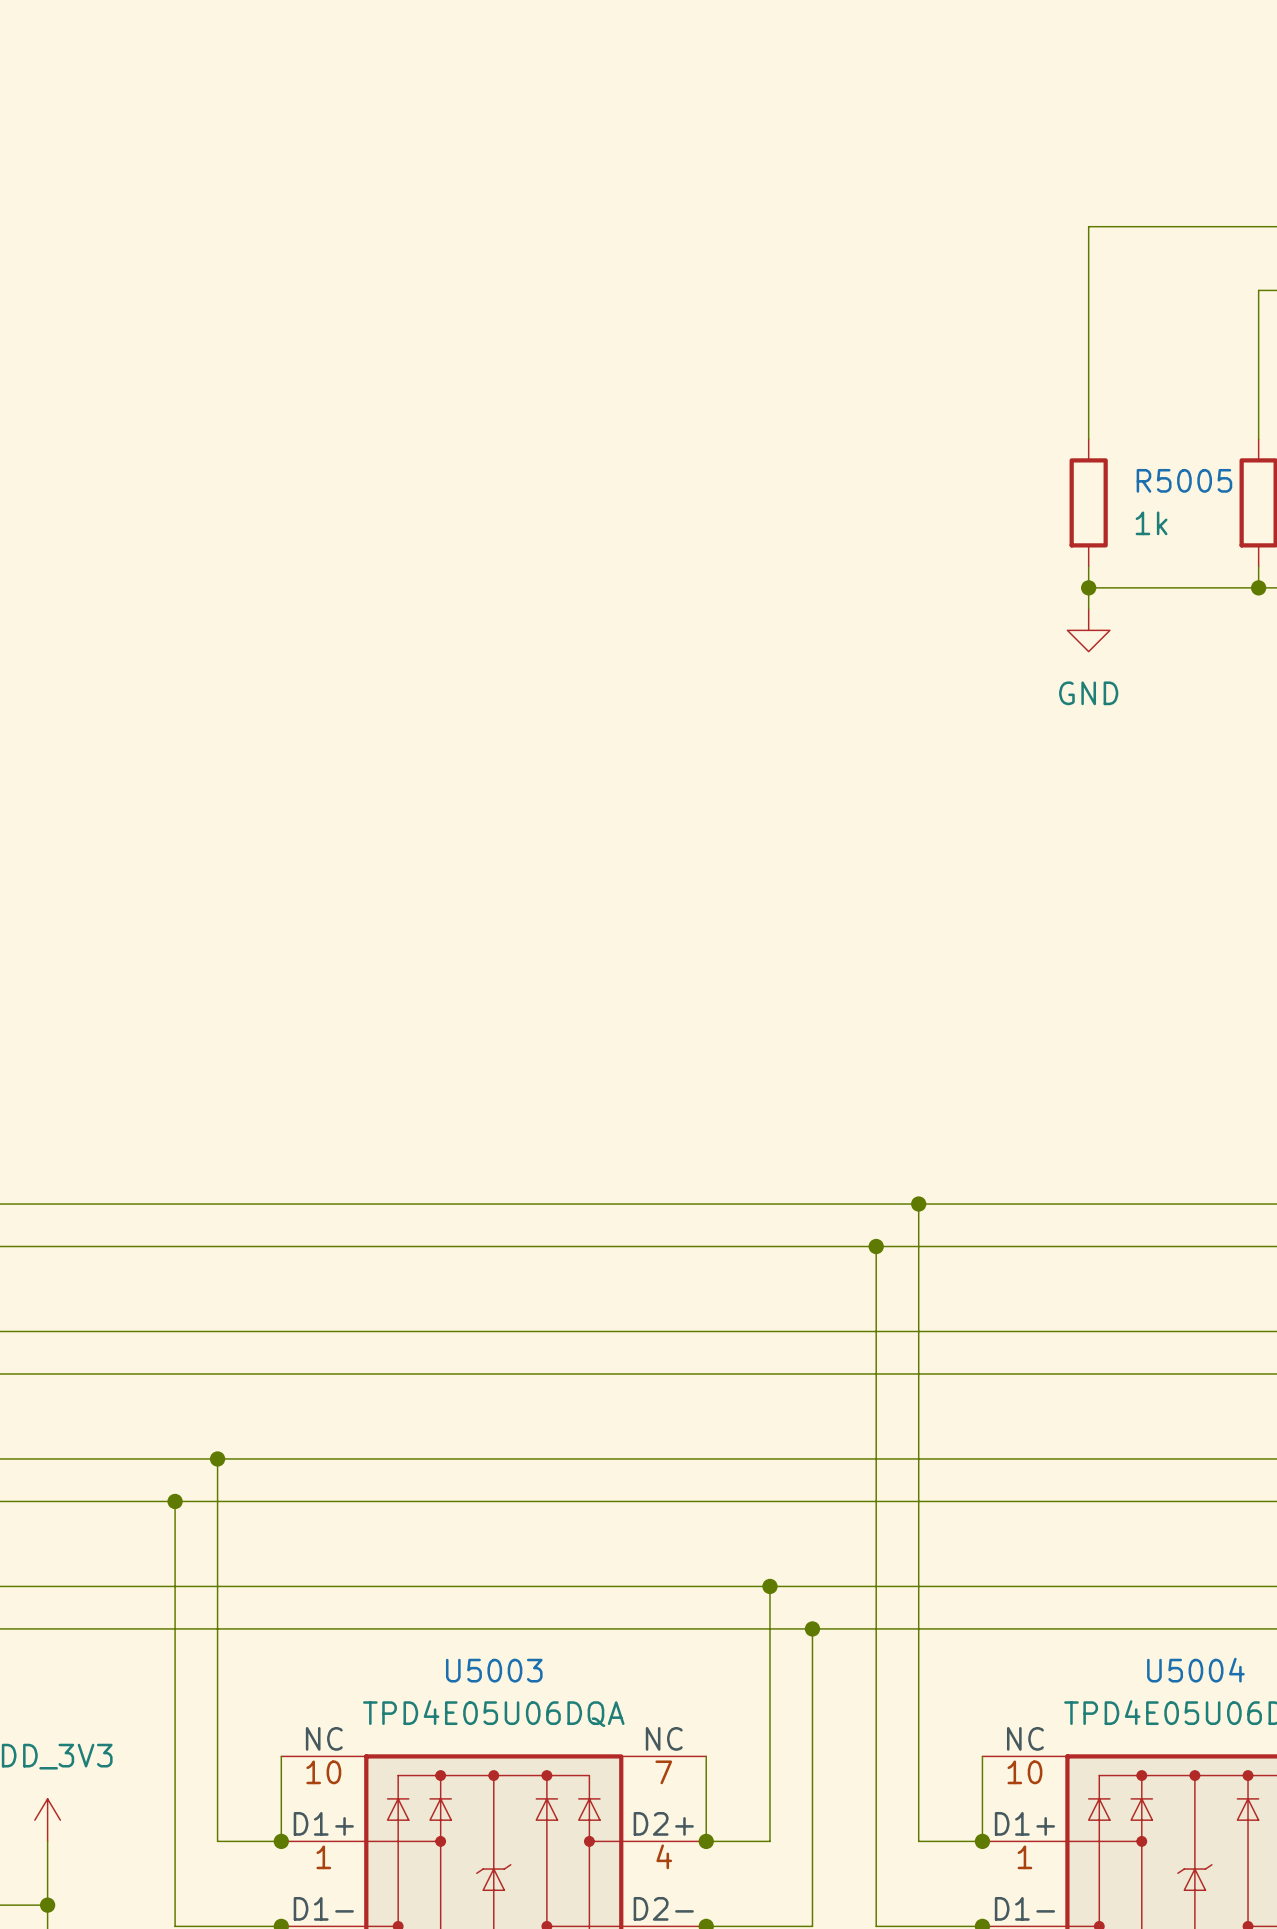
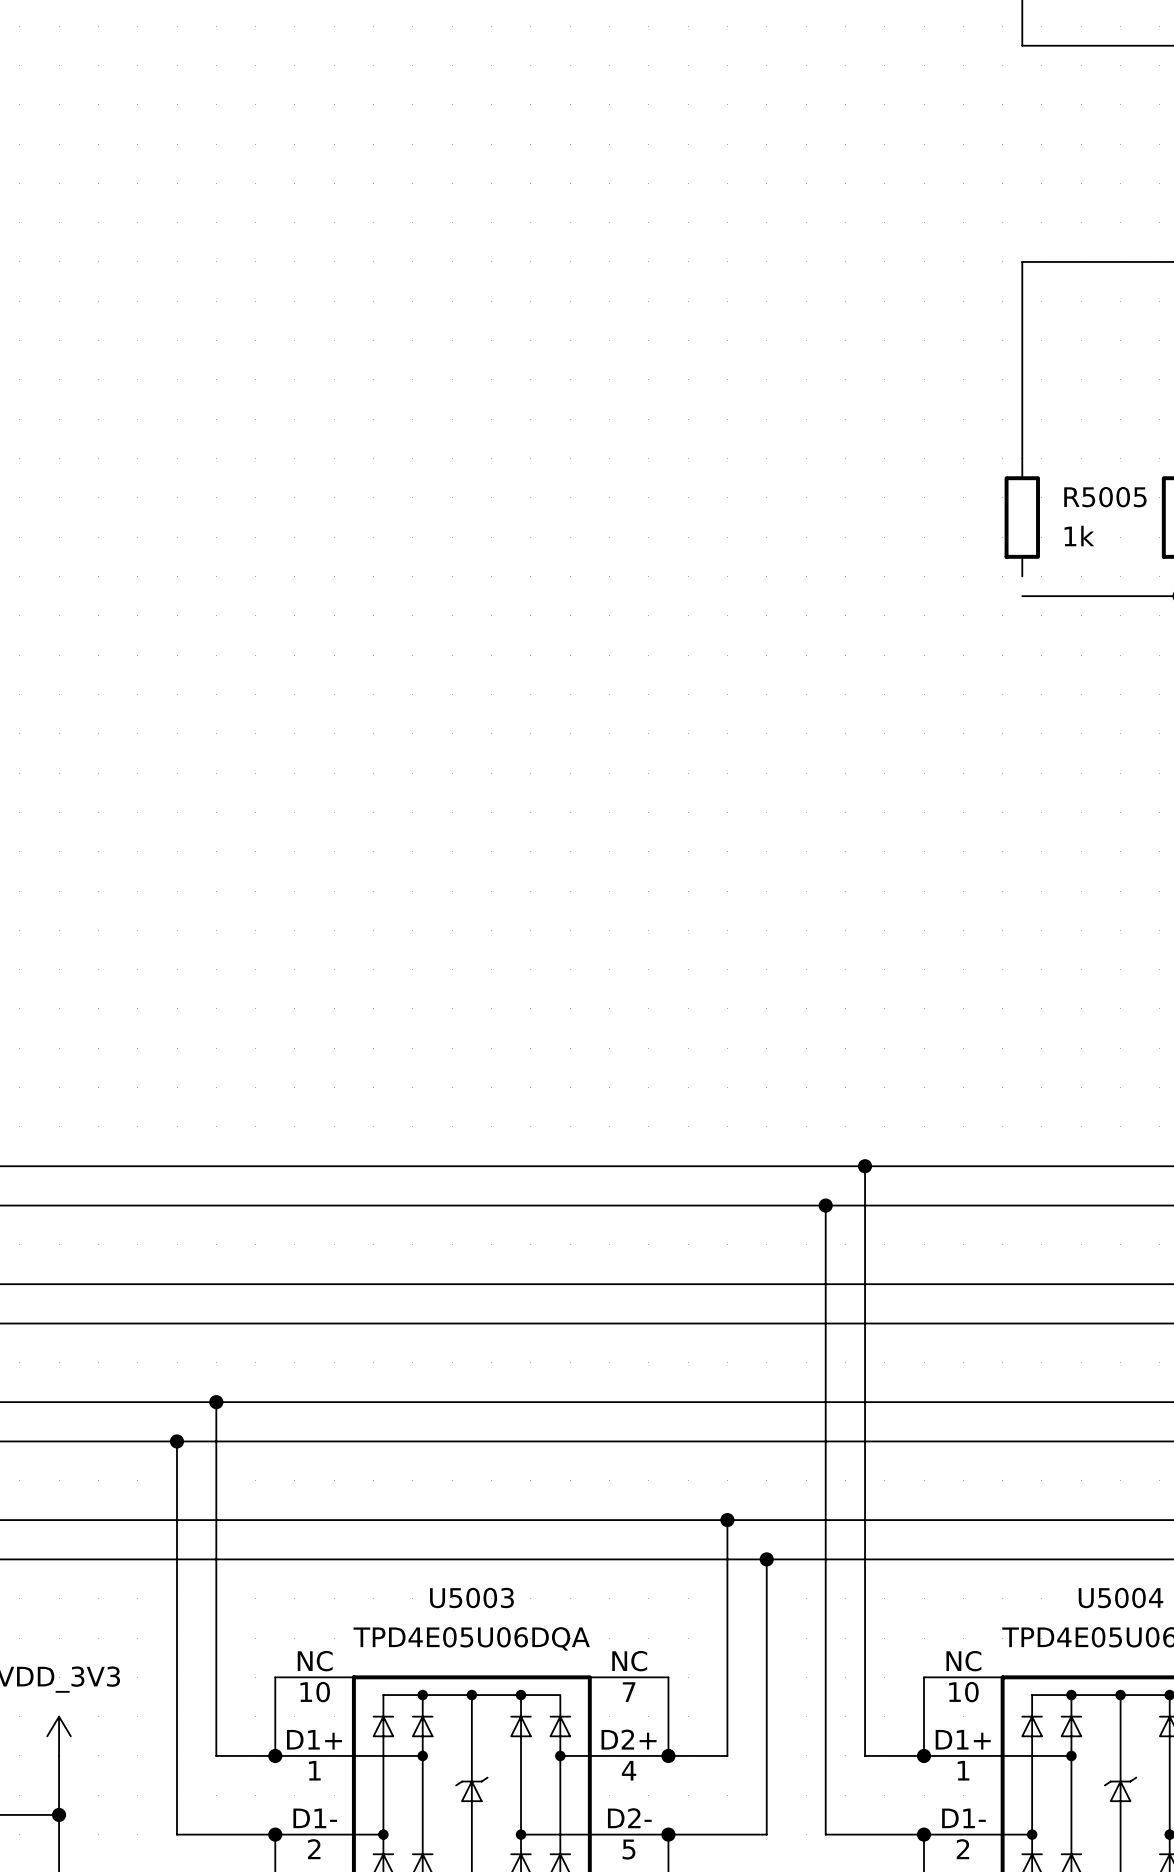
wire: (1088, 566) (1088, 609) -> none
junction: (1088, 587) -> none
power symbol: GND (1088, 630) -> none

